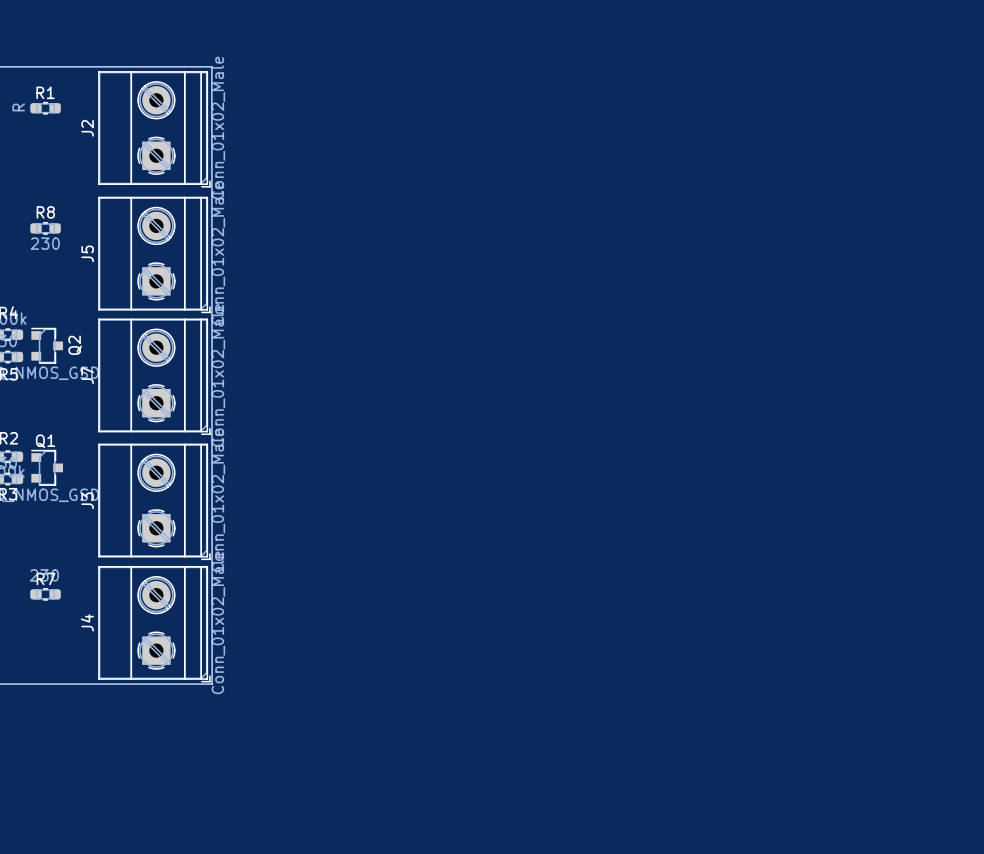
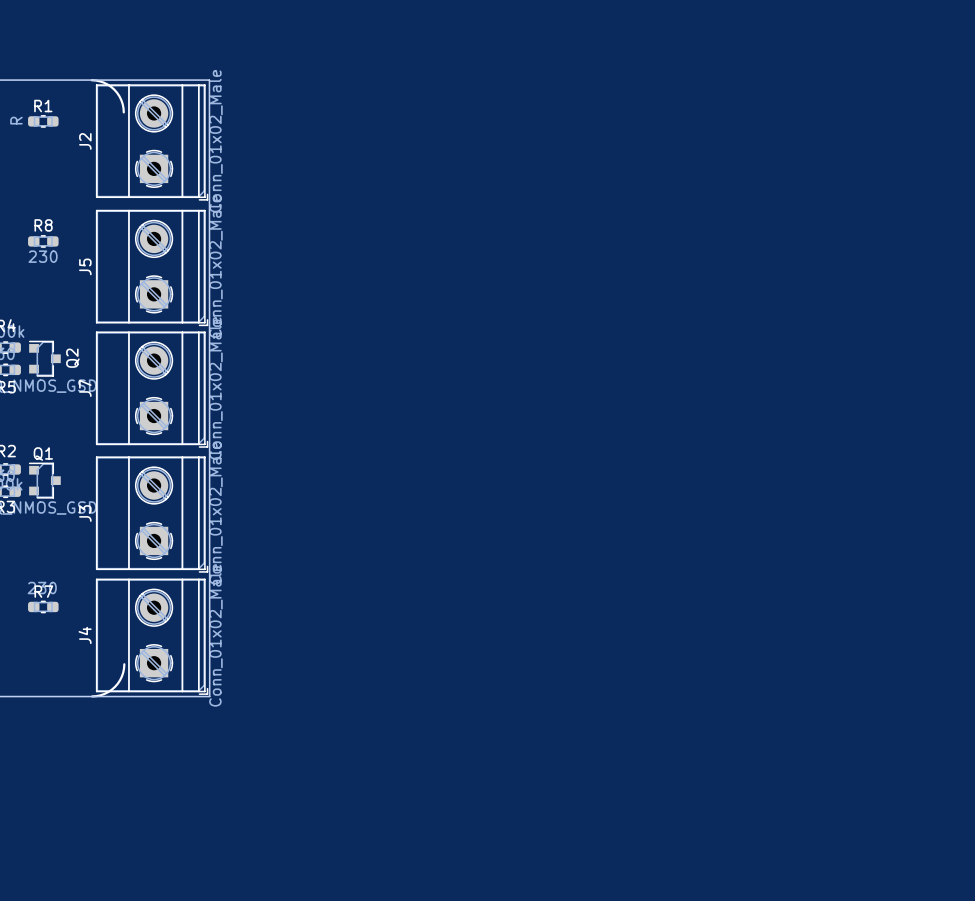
line: none -> (91, 80) (103, 82) (114, 89) (121, 100) (123, 112)
line: none -> (124, 664) (121, 676) (114, 687) (104, 693) (92, 696)

